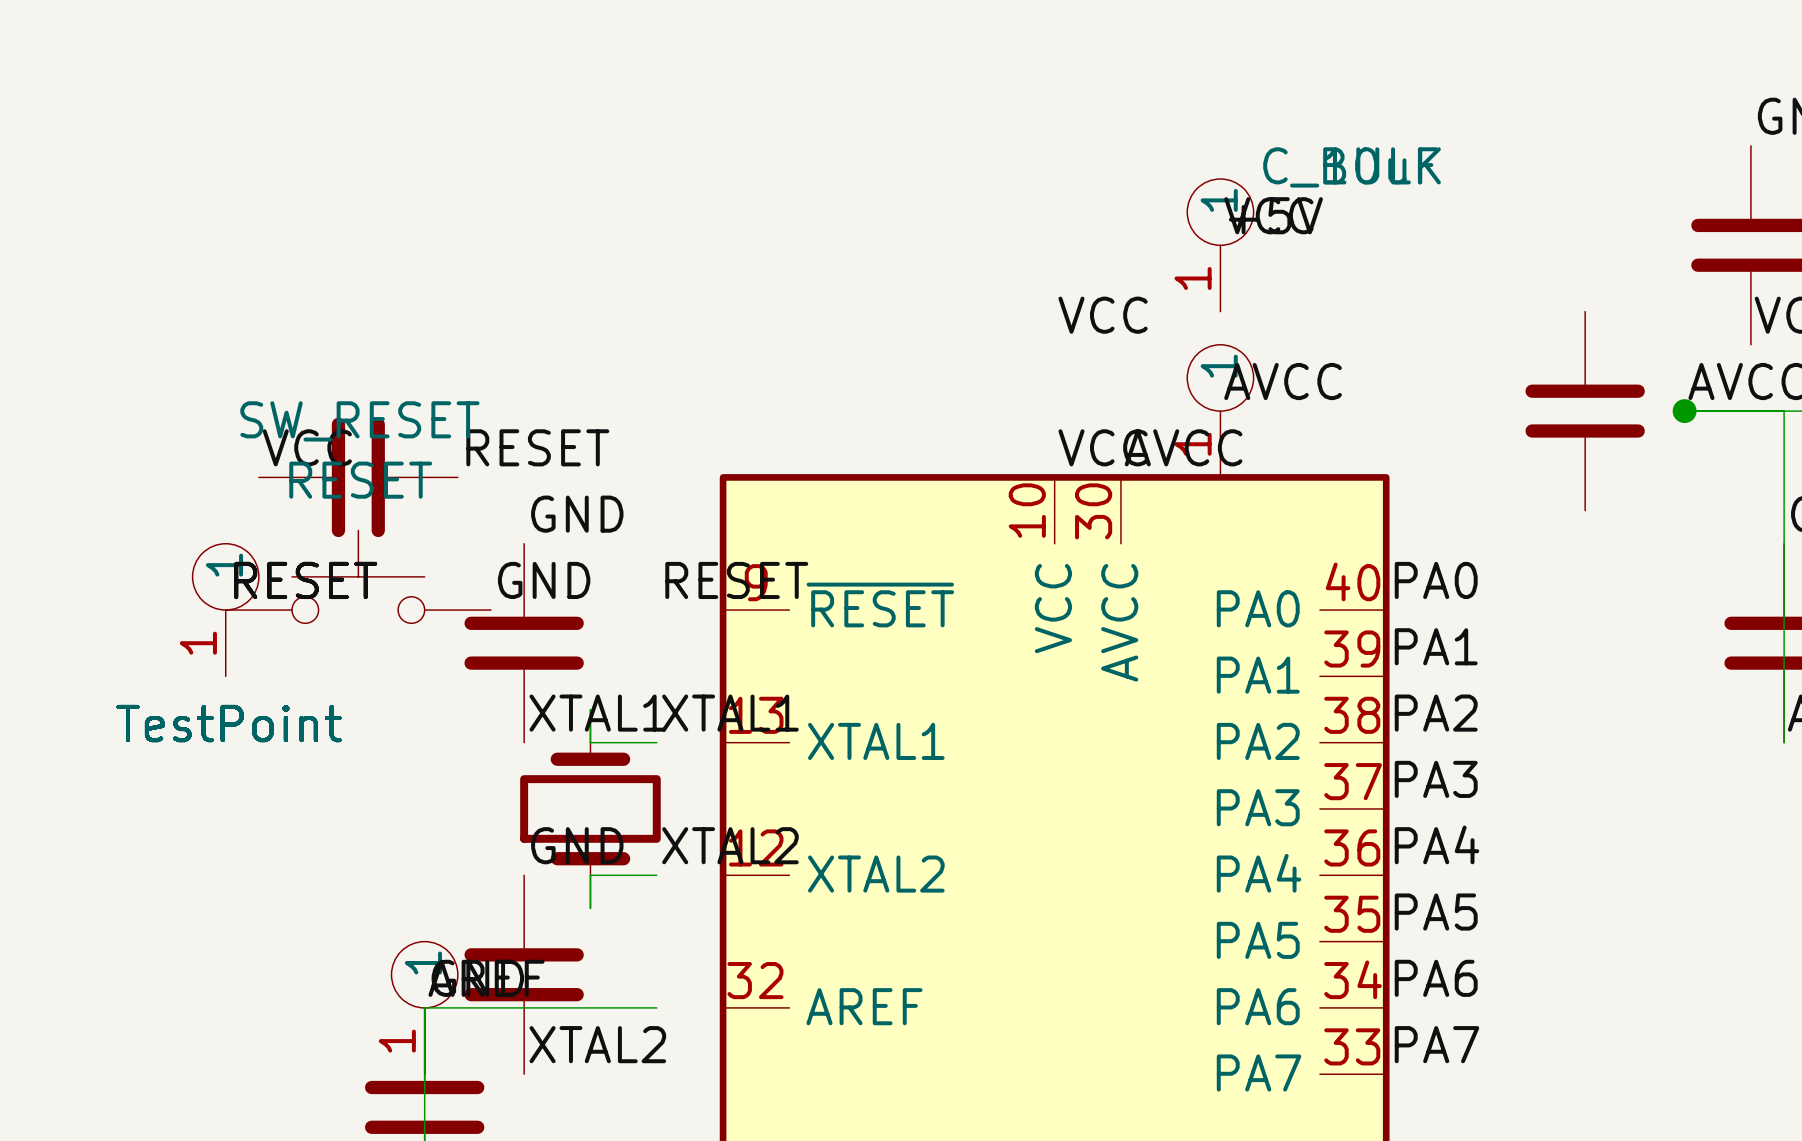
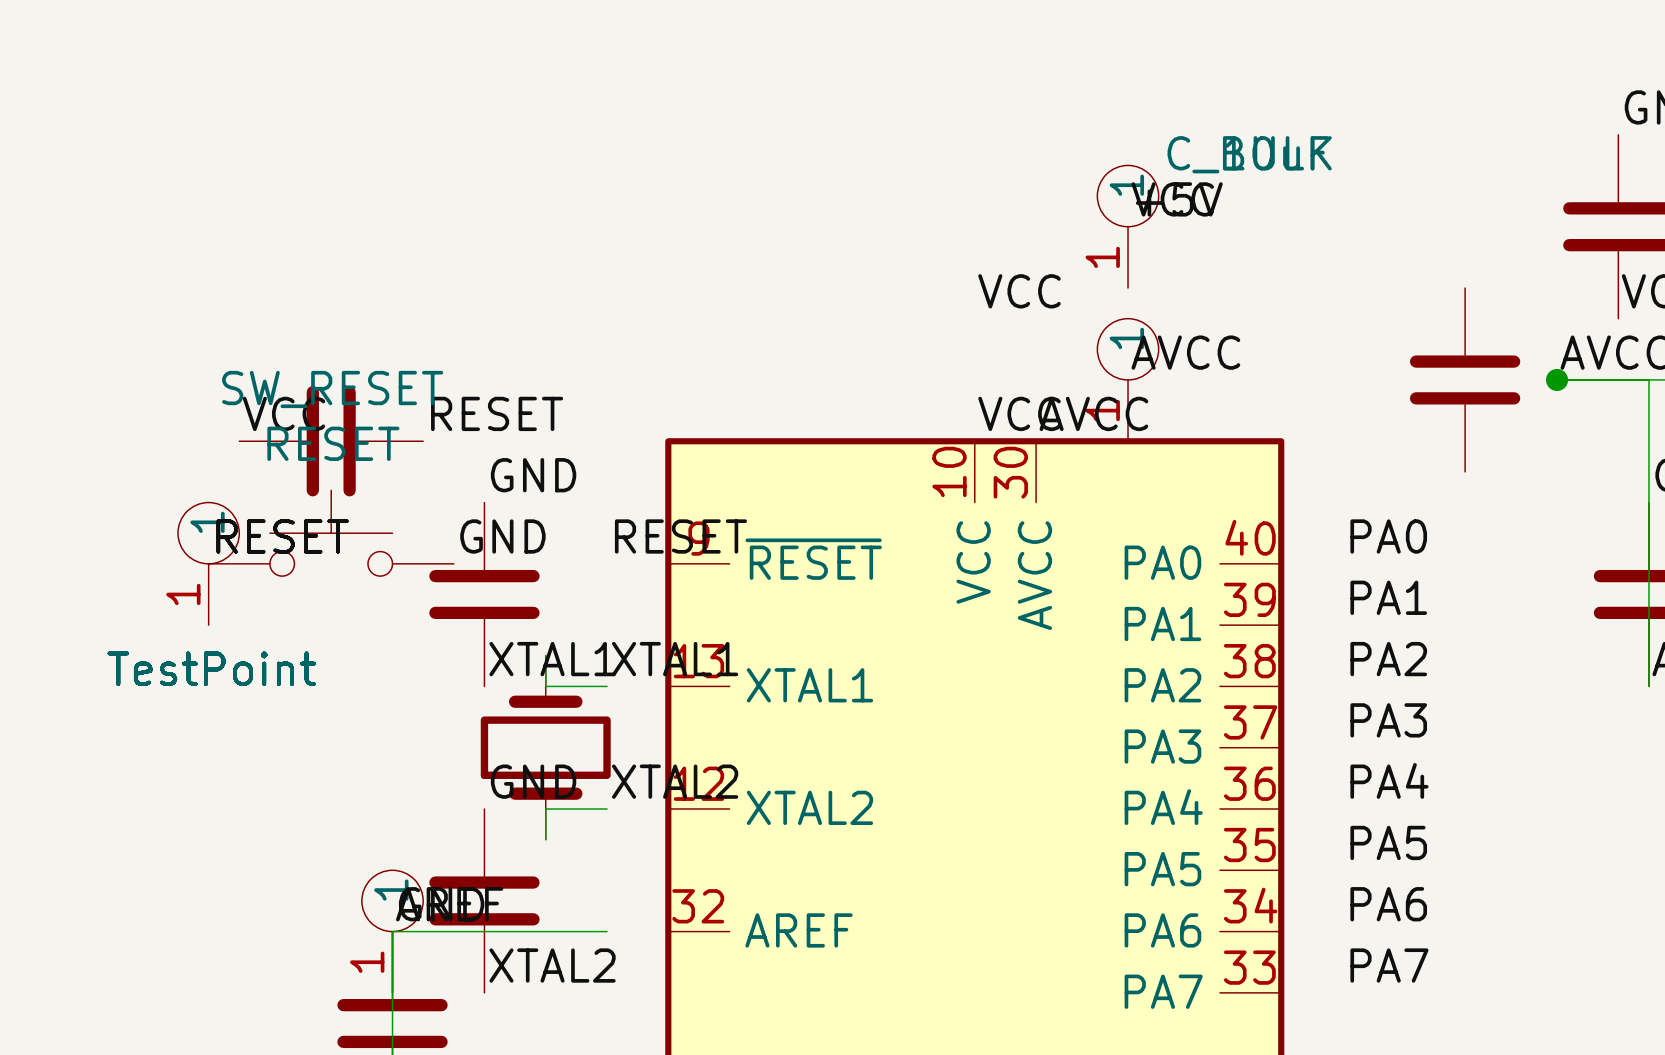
label position: PA0 (1436, 580) -> PA0 (1388, 536)
label position: PA1 (1436, 646) -> PA1 (1388, 597)
label position: PA2 (1436, 713) -> PA2 (1388, 659)
label position: PA3 (1436, 779) -> PA3 (1388, 720)
label position: PA4 (1436, 844) -> PA4 (1389, 780)
label position: PA5 (1436, 912) -> PA5 (1388, 842)
label position: PA6 (1436, 978) -> PA6 (1388, 904)
label position: PA7 (1436, 1044) -> PA7 (1389, 965)

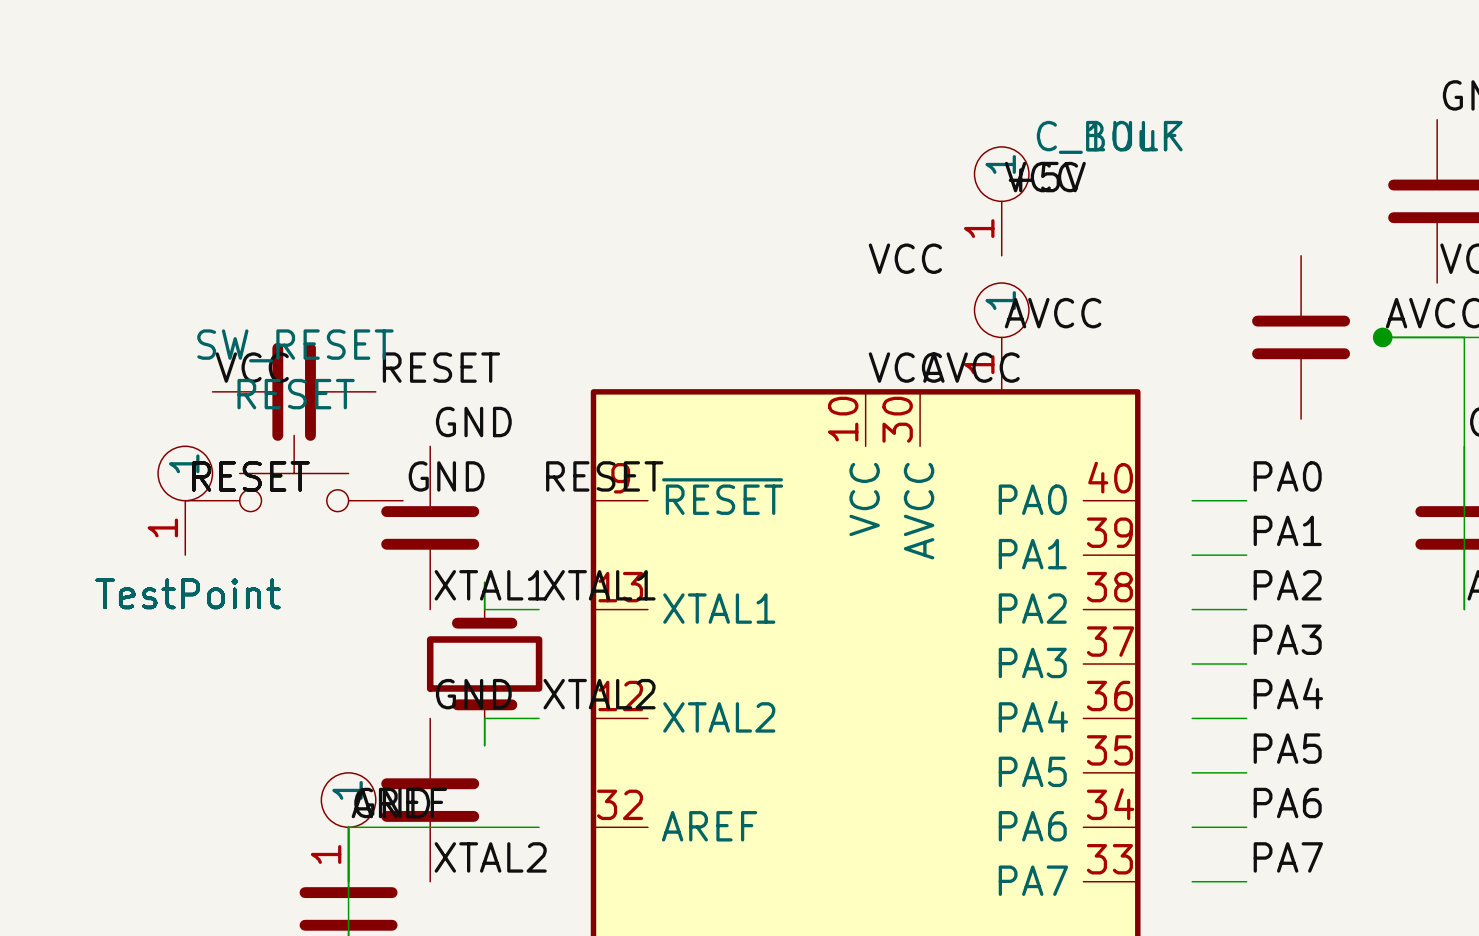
label position: PA0 (1388, 536) -> PA0 (1287, 476)
wire: none -> (1192, 500) (1246, 500)
label position: PA1 (1388, 597) -> PA1 (1287, 530)
wire: none -> (1192, 555) (1246, 555)
label position: PA2 (1388, 659) -> PA2 (1287, 585)
wire: none -> (1192, 609) (1246, 609)
label position: PA3 (1388, 720) -> PA3 (1287, 639)
wire: none -> (1192, 664) (1246, 664)
label position: PA4 (1389, 780) -> PA4 (1288, 693)
wire: none -> (1192, 718) (1246, 718)
label position: PA5 (1388, 842) -> PA5 (1287, 748)
wire: none -> (1192, 772) (1246, 772)
label position: PA6 (1388, 904) -> PA6 (1287, 803)
wire: none -> (1192, 827) (1246, 827)
label position: PA7 (1389, 965) -> PA7 (1288, 857)
wire: none -> (1192, 881) (1246, 881)

